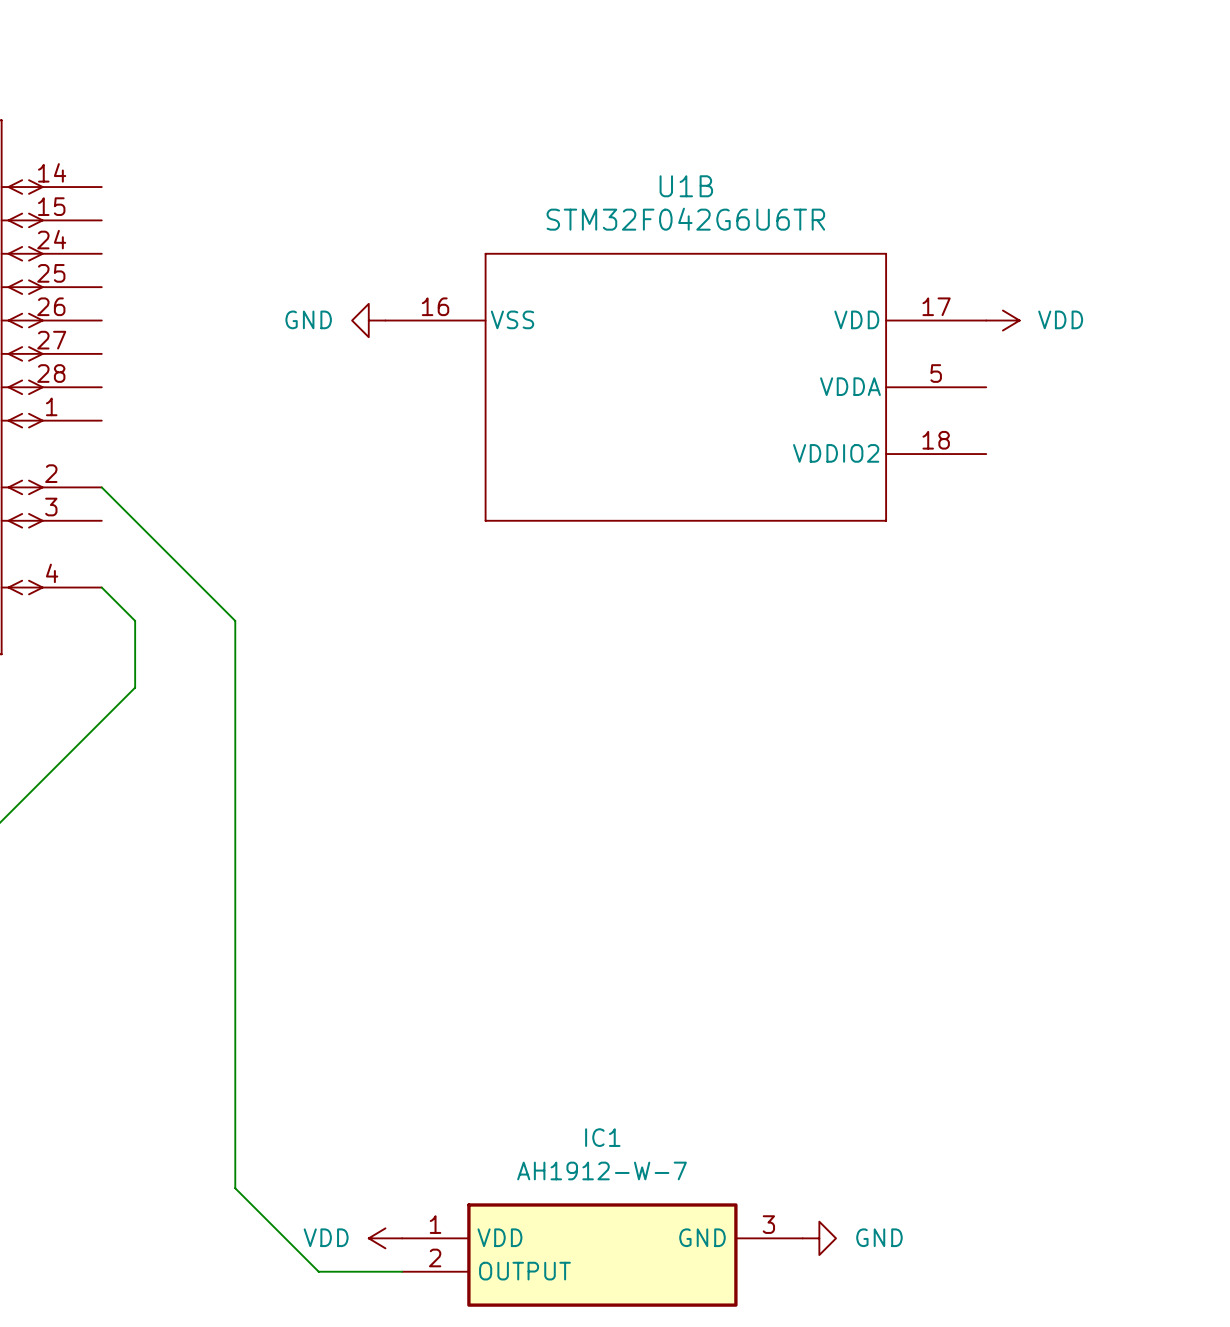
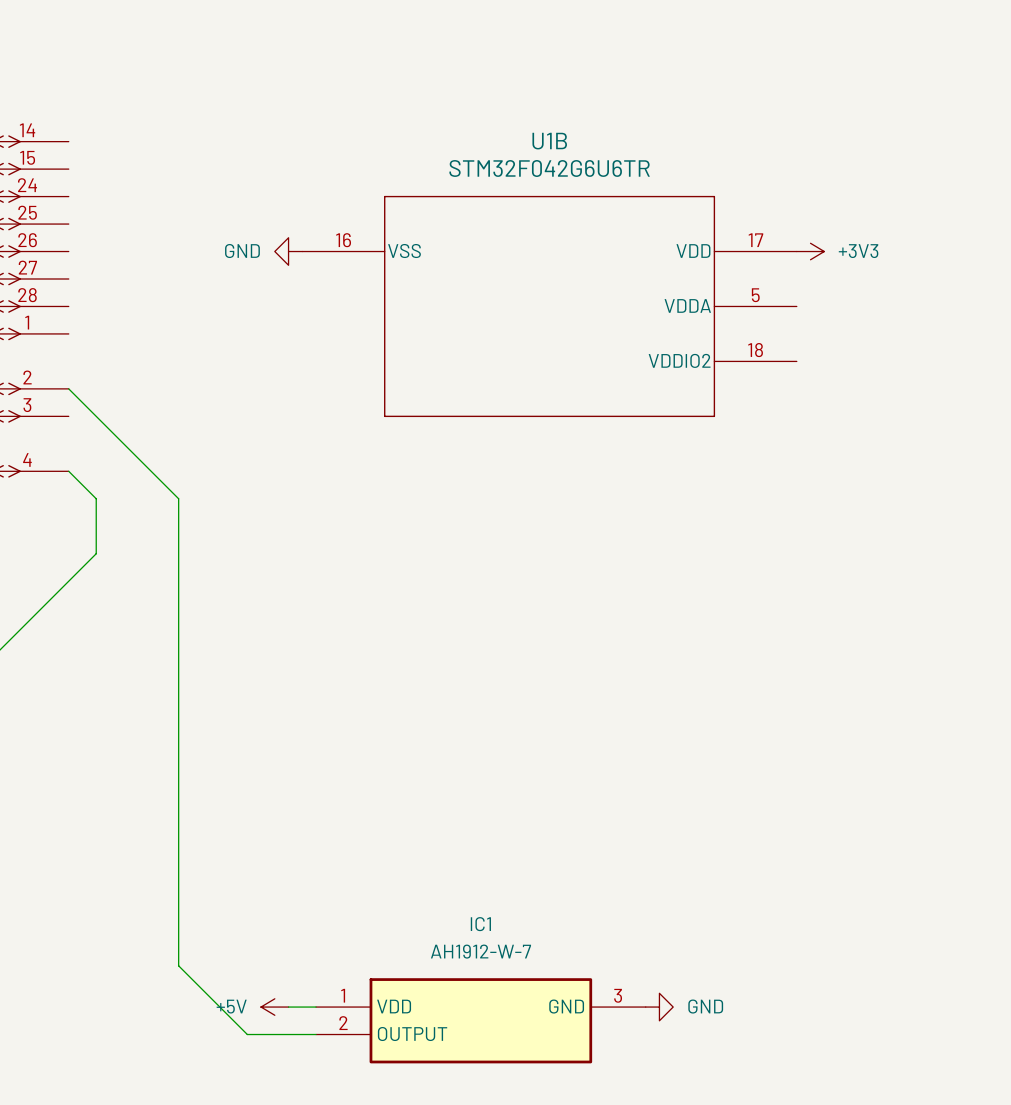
power symbol: VDD (1002, 320) -> +3V3 (810, 251)
power symbol: none -> +5V (274, 1007)
power symbol: VDD (385, 1238) -> none

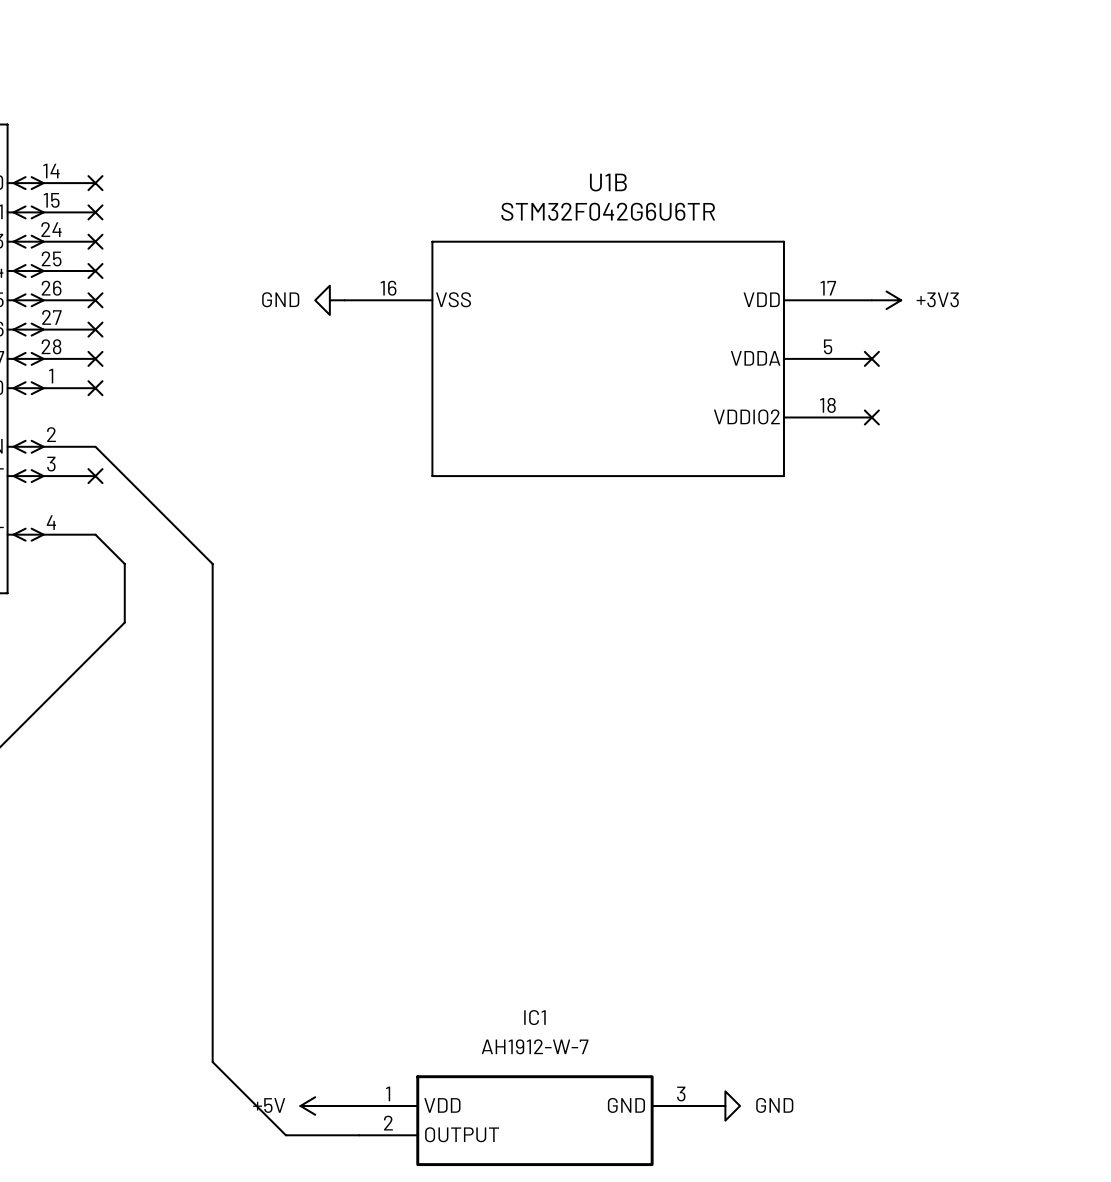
no-connect mark: none -> (95, 183)
no-connect mark: none -> (95, 212)
no-connect mark: none -> (95, 241)
no-connect mark: none -> (95, 271)
no-connect mark: none -> (95, 300)
no-connect mark: none -> (95, 329)
no-connect mark: none -> (95, 358)
no-connect mark: none -> (871, 358)
no-connect mark: none -> (95, 388)
no-connect mark: none -> (871, 417)
no-connect mark: none -> (95, 476)

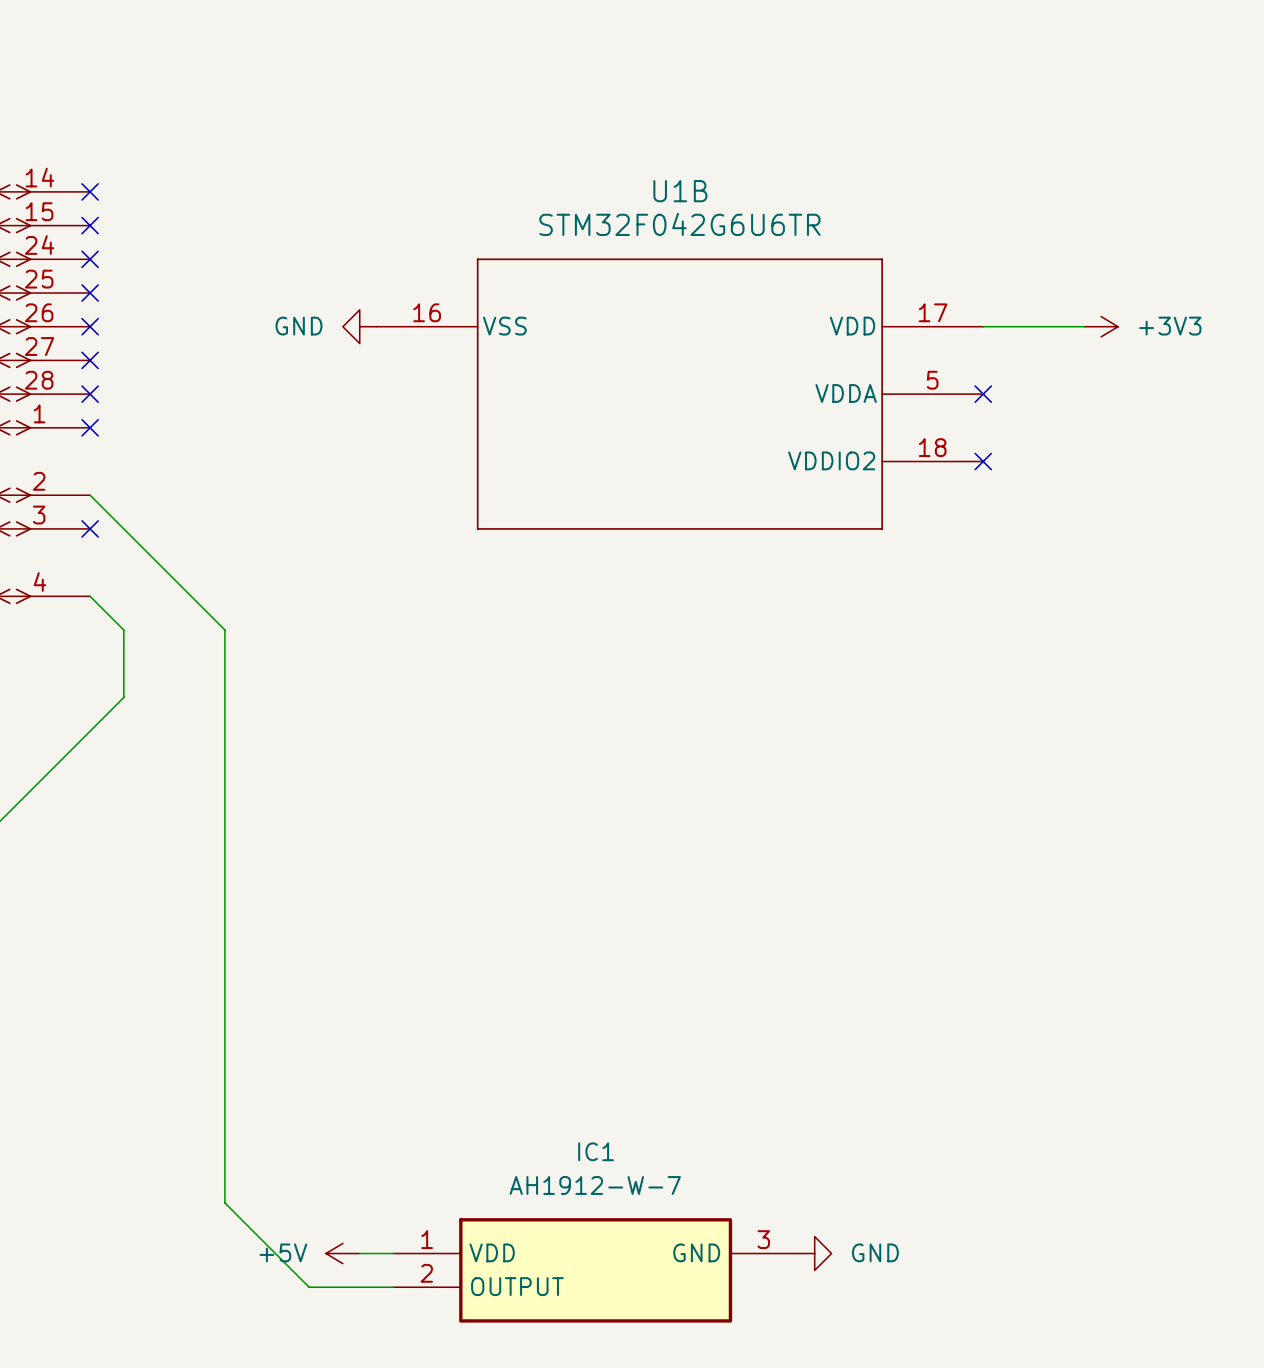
wire: none -> (983, 326) (1084, 326)
power symbol position: +3V3 (886, 300) -> +3V3 (1101, 326)

